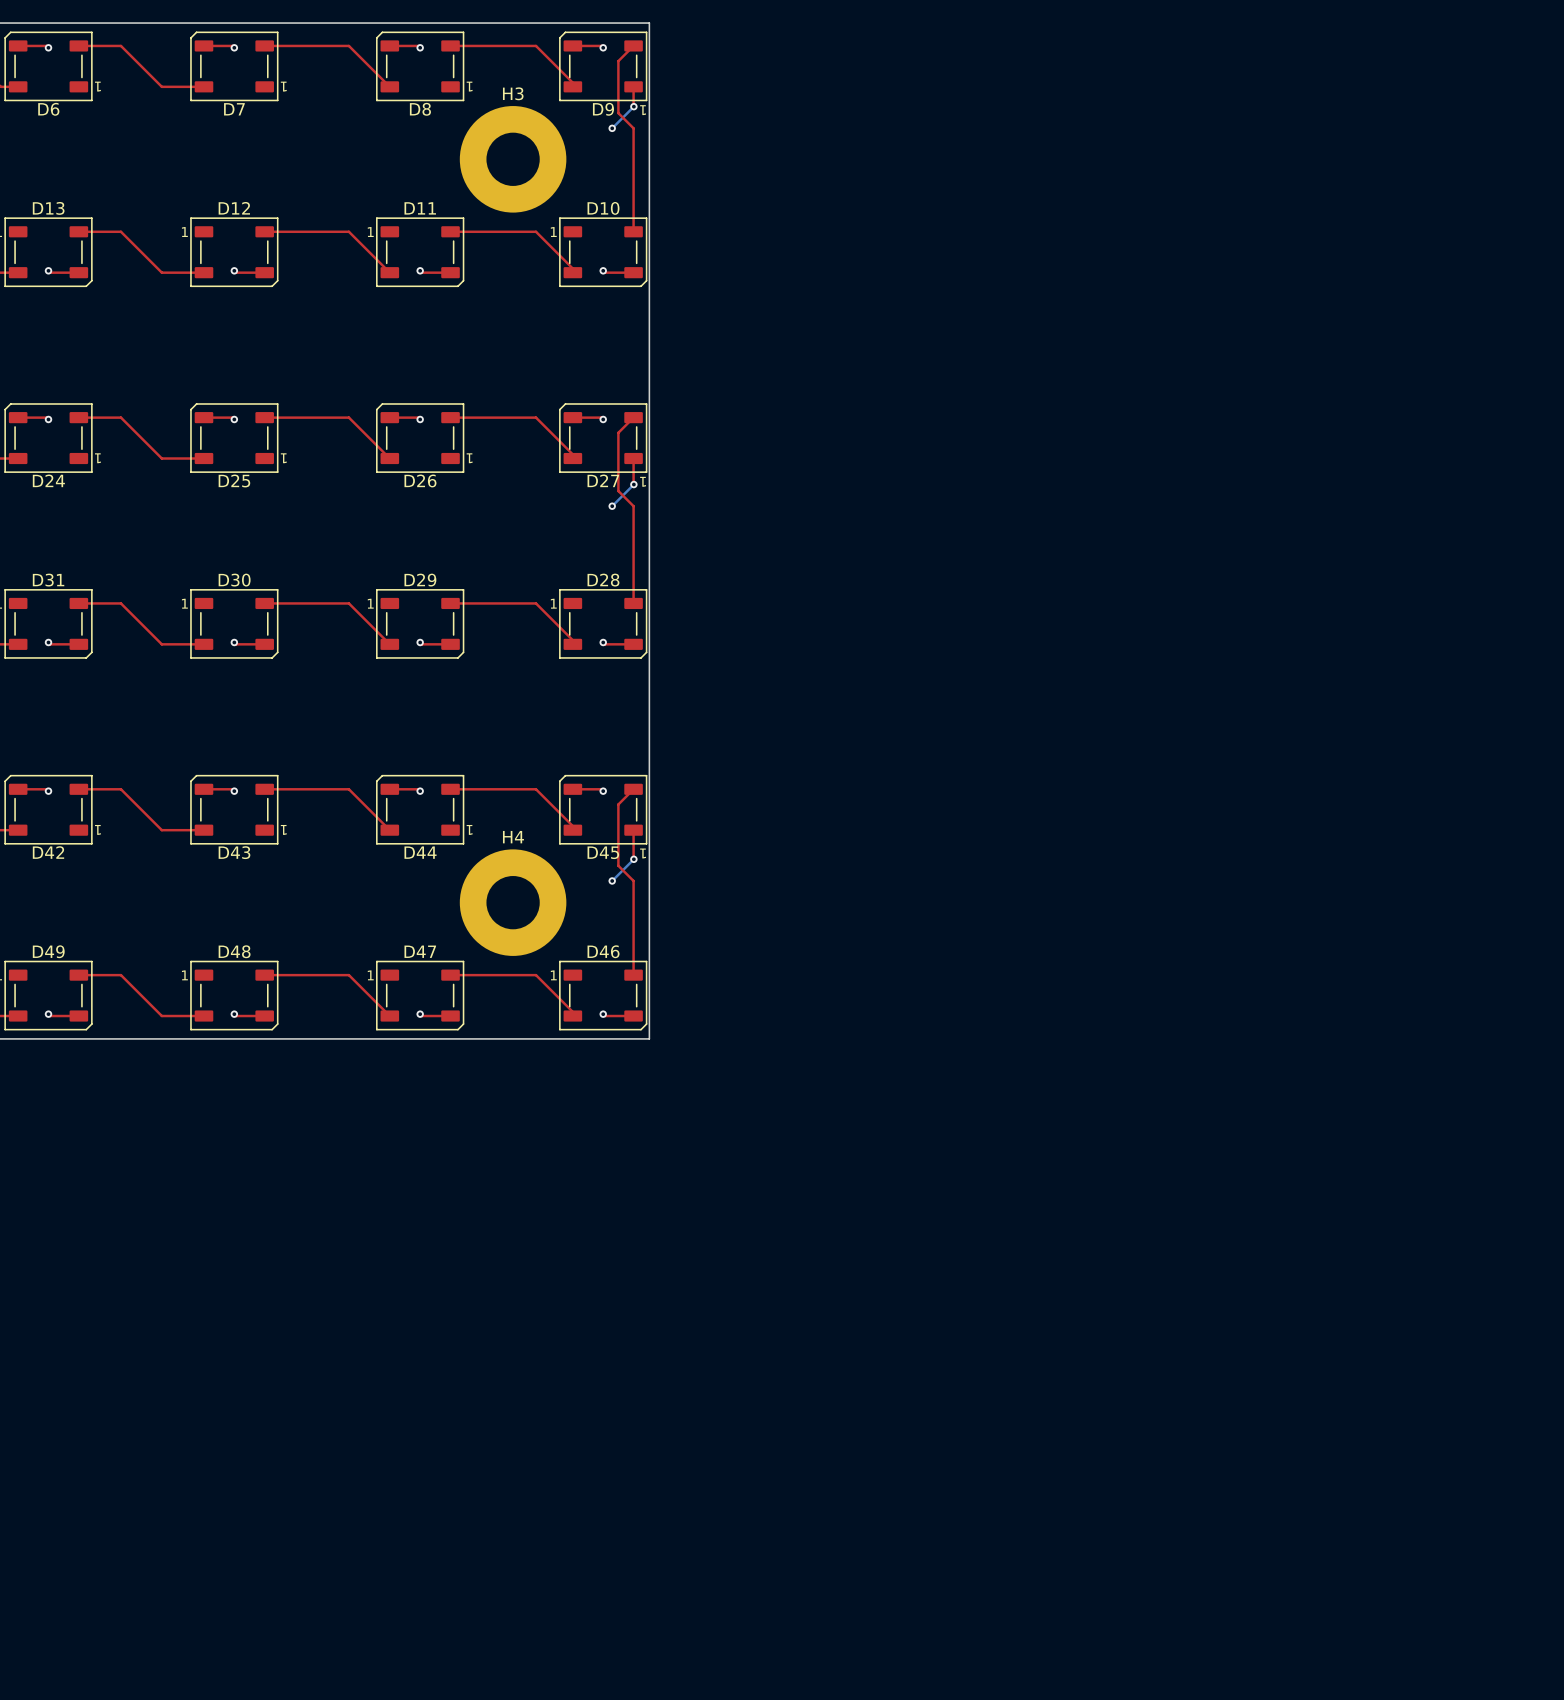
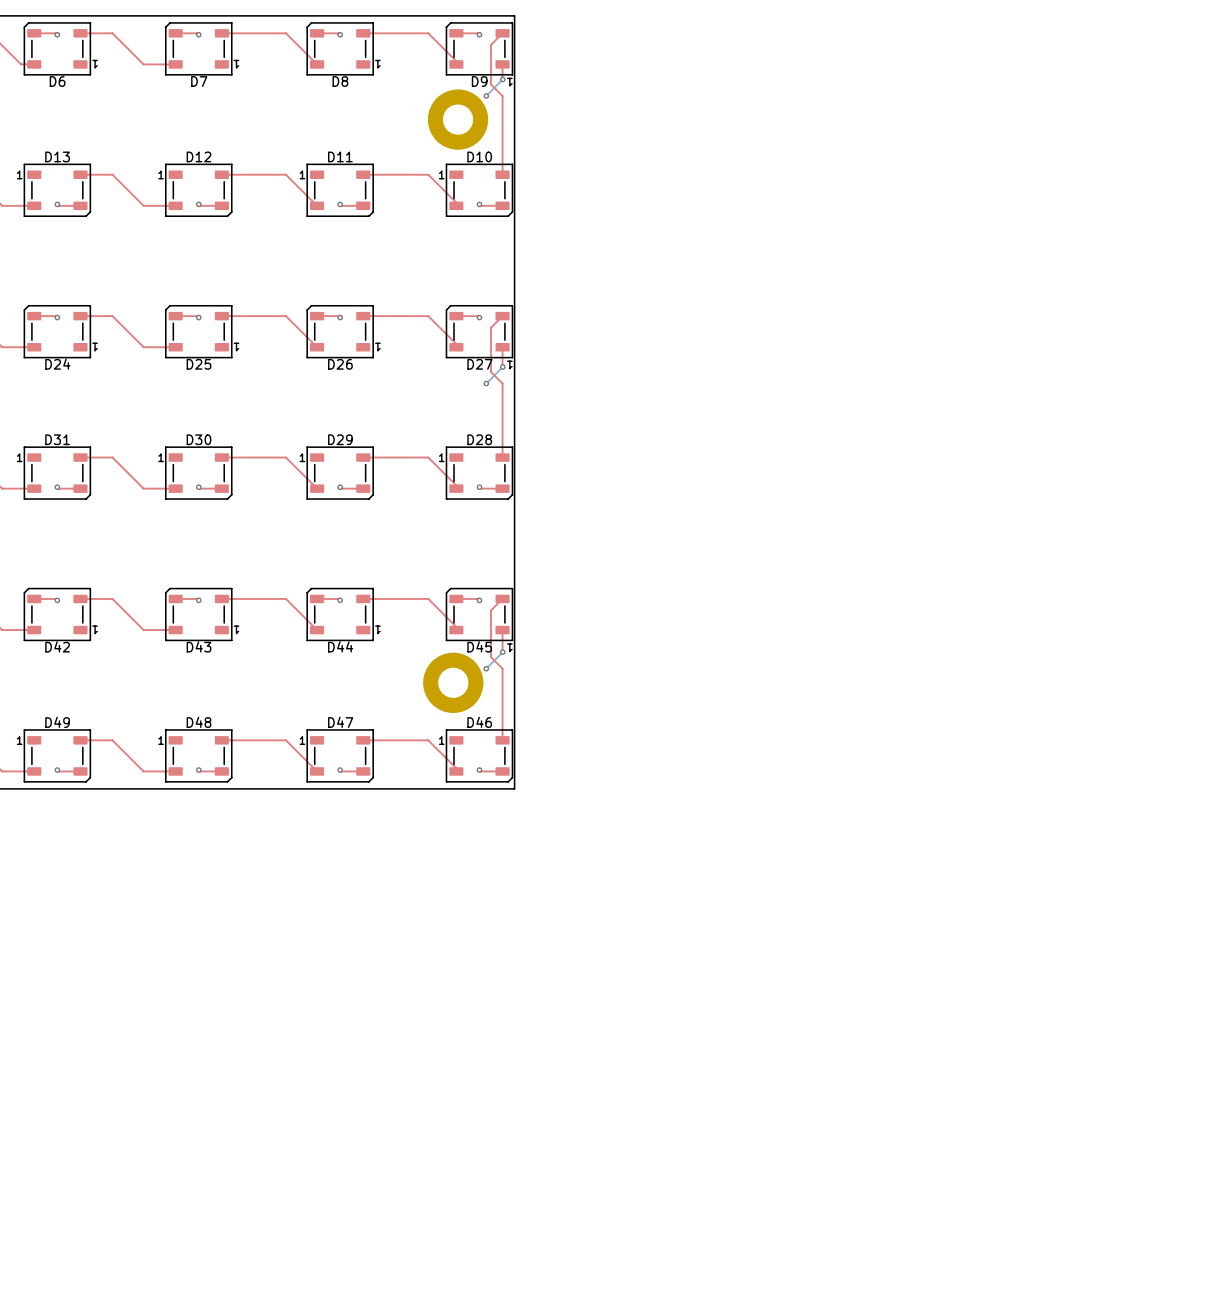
H3: (513, 159) -> none
part: none -> (458, 119)
part: none -> (453, 682)
H4: (513, 902) -> none

